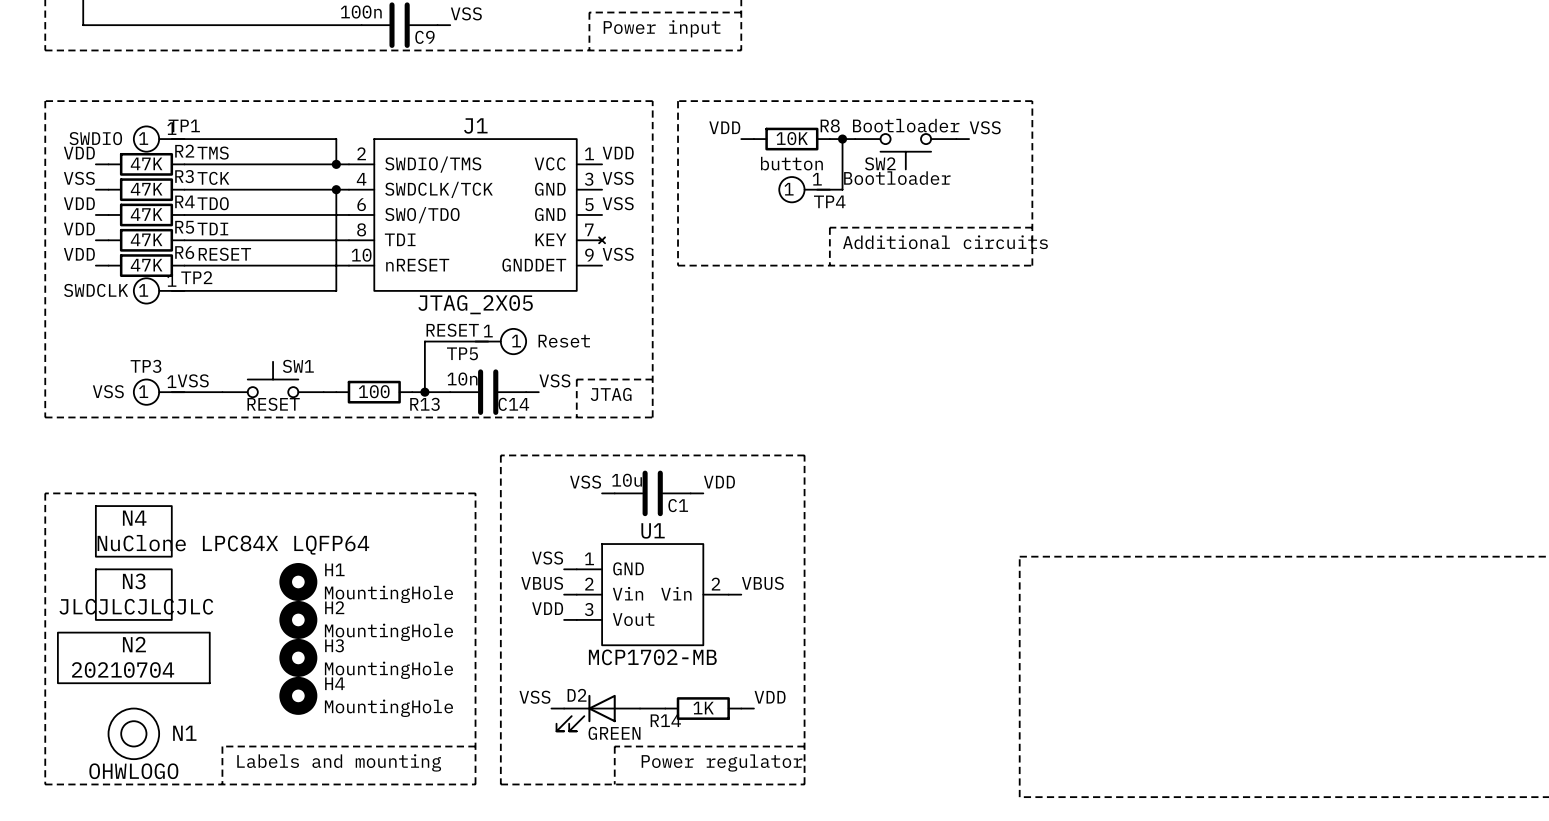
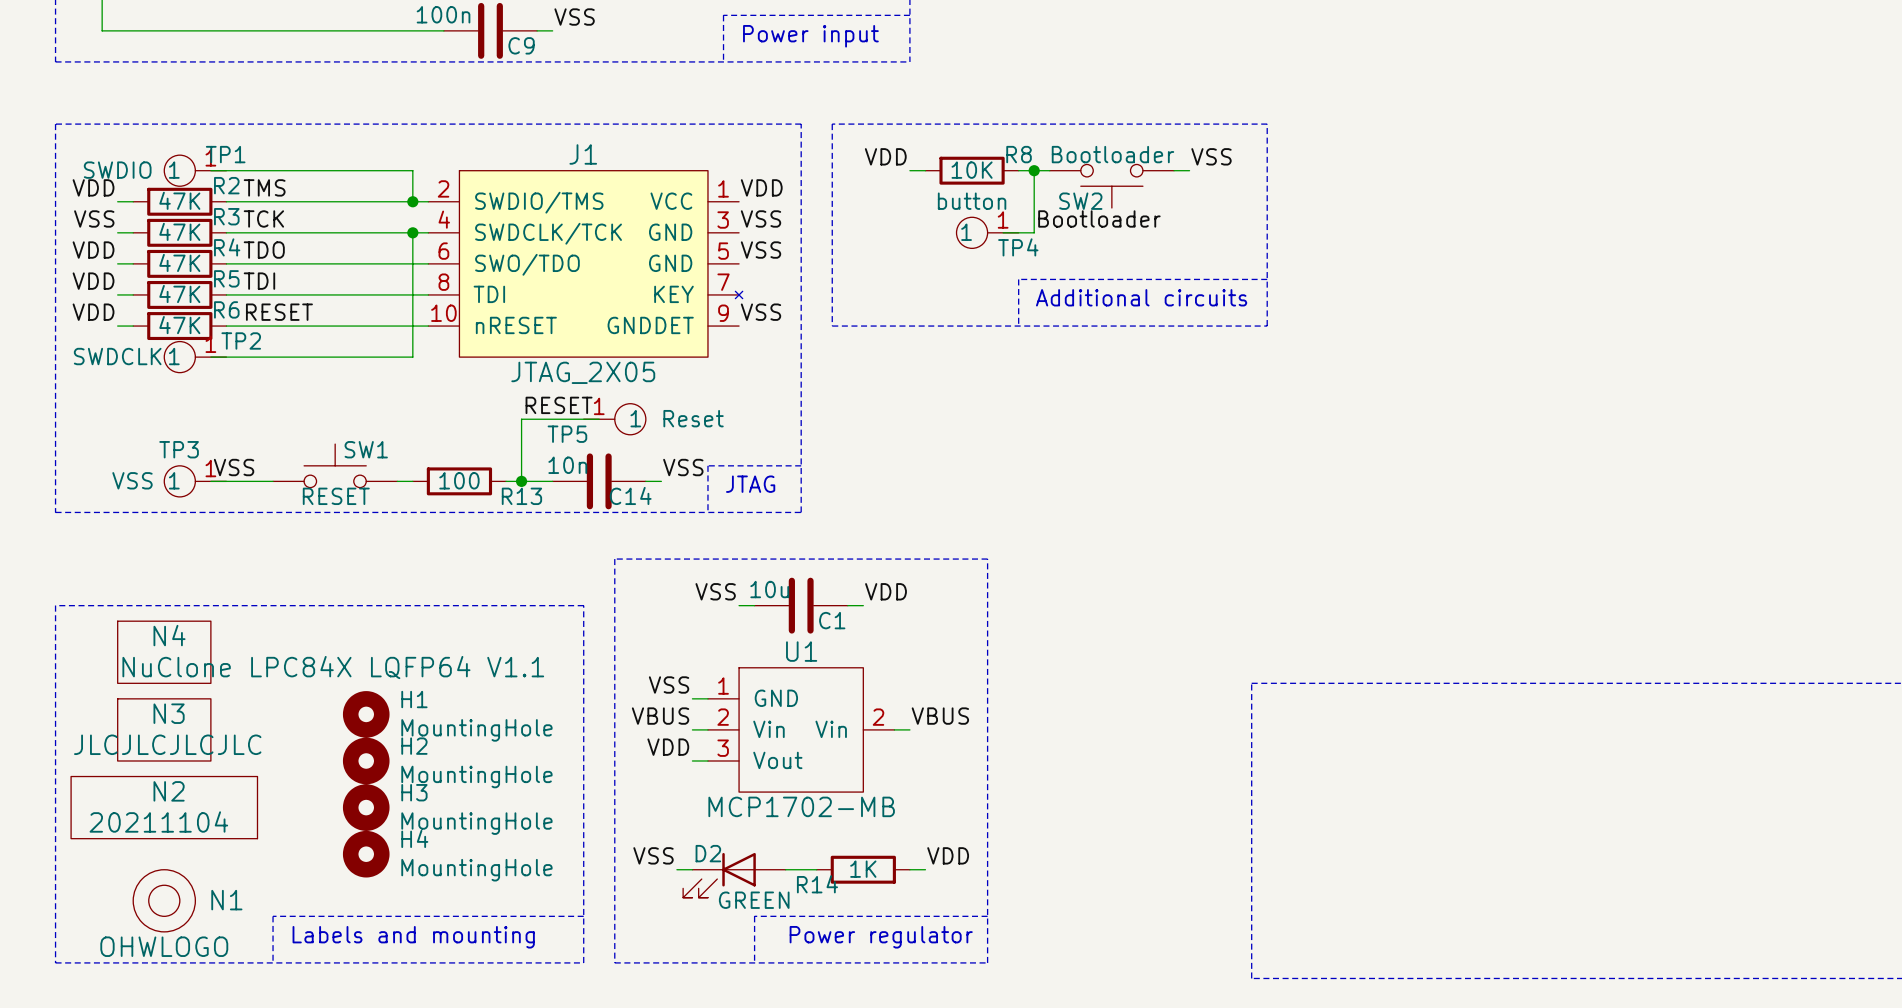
N4 value: NuClone LPC84X LQFP64 (233, 544) -> NuClone LPC84X LQFP64 V1.1 (333, 667)
N2 value: 20210704 (123, 670) -> 20211104 (158, 821)

